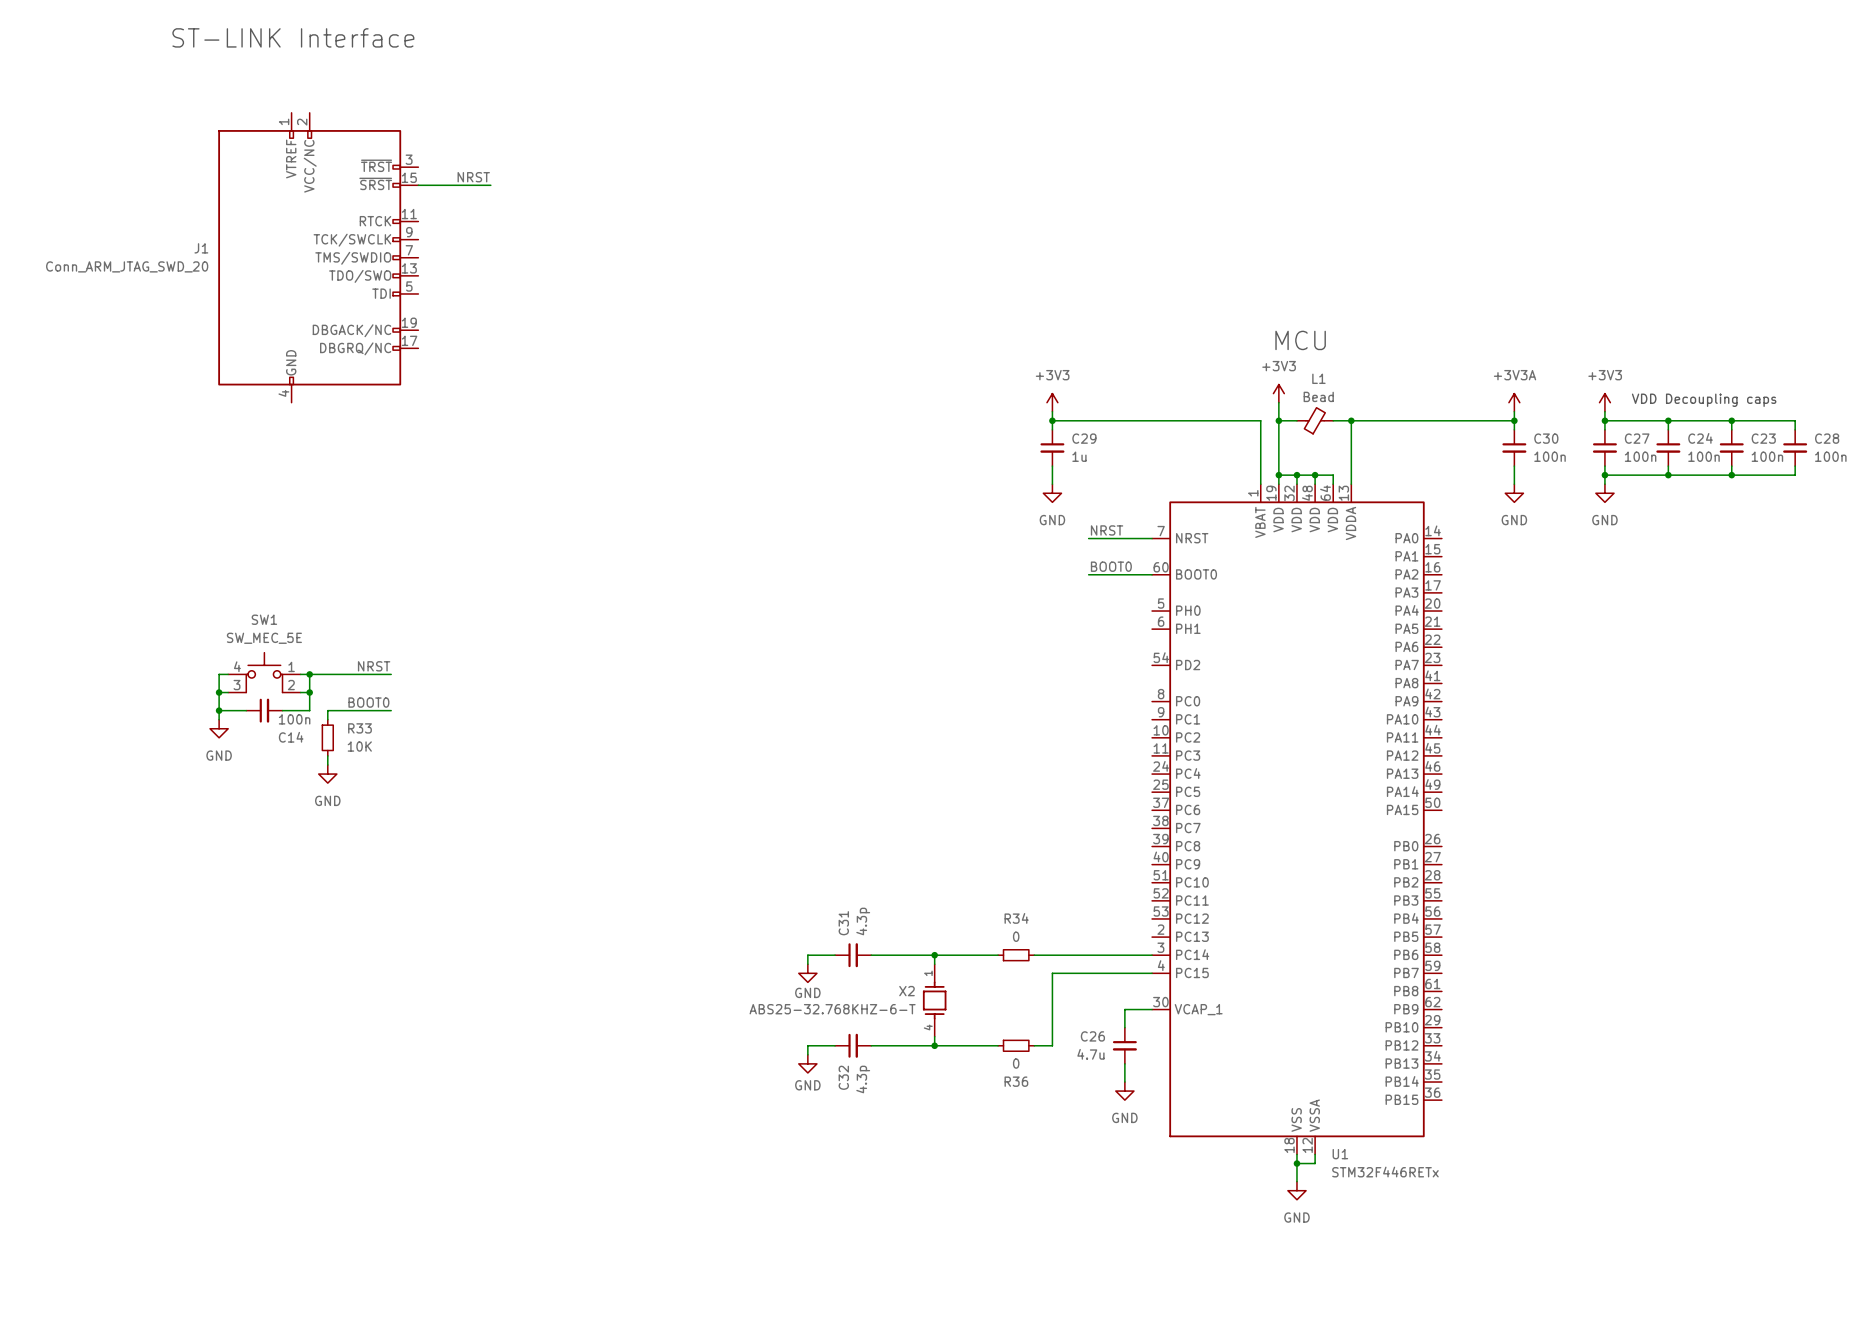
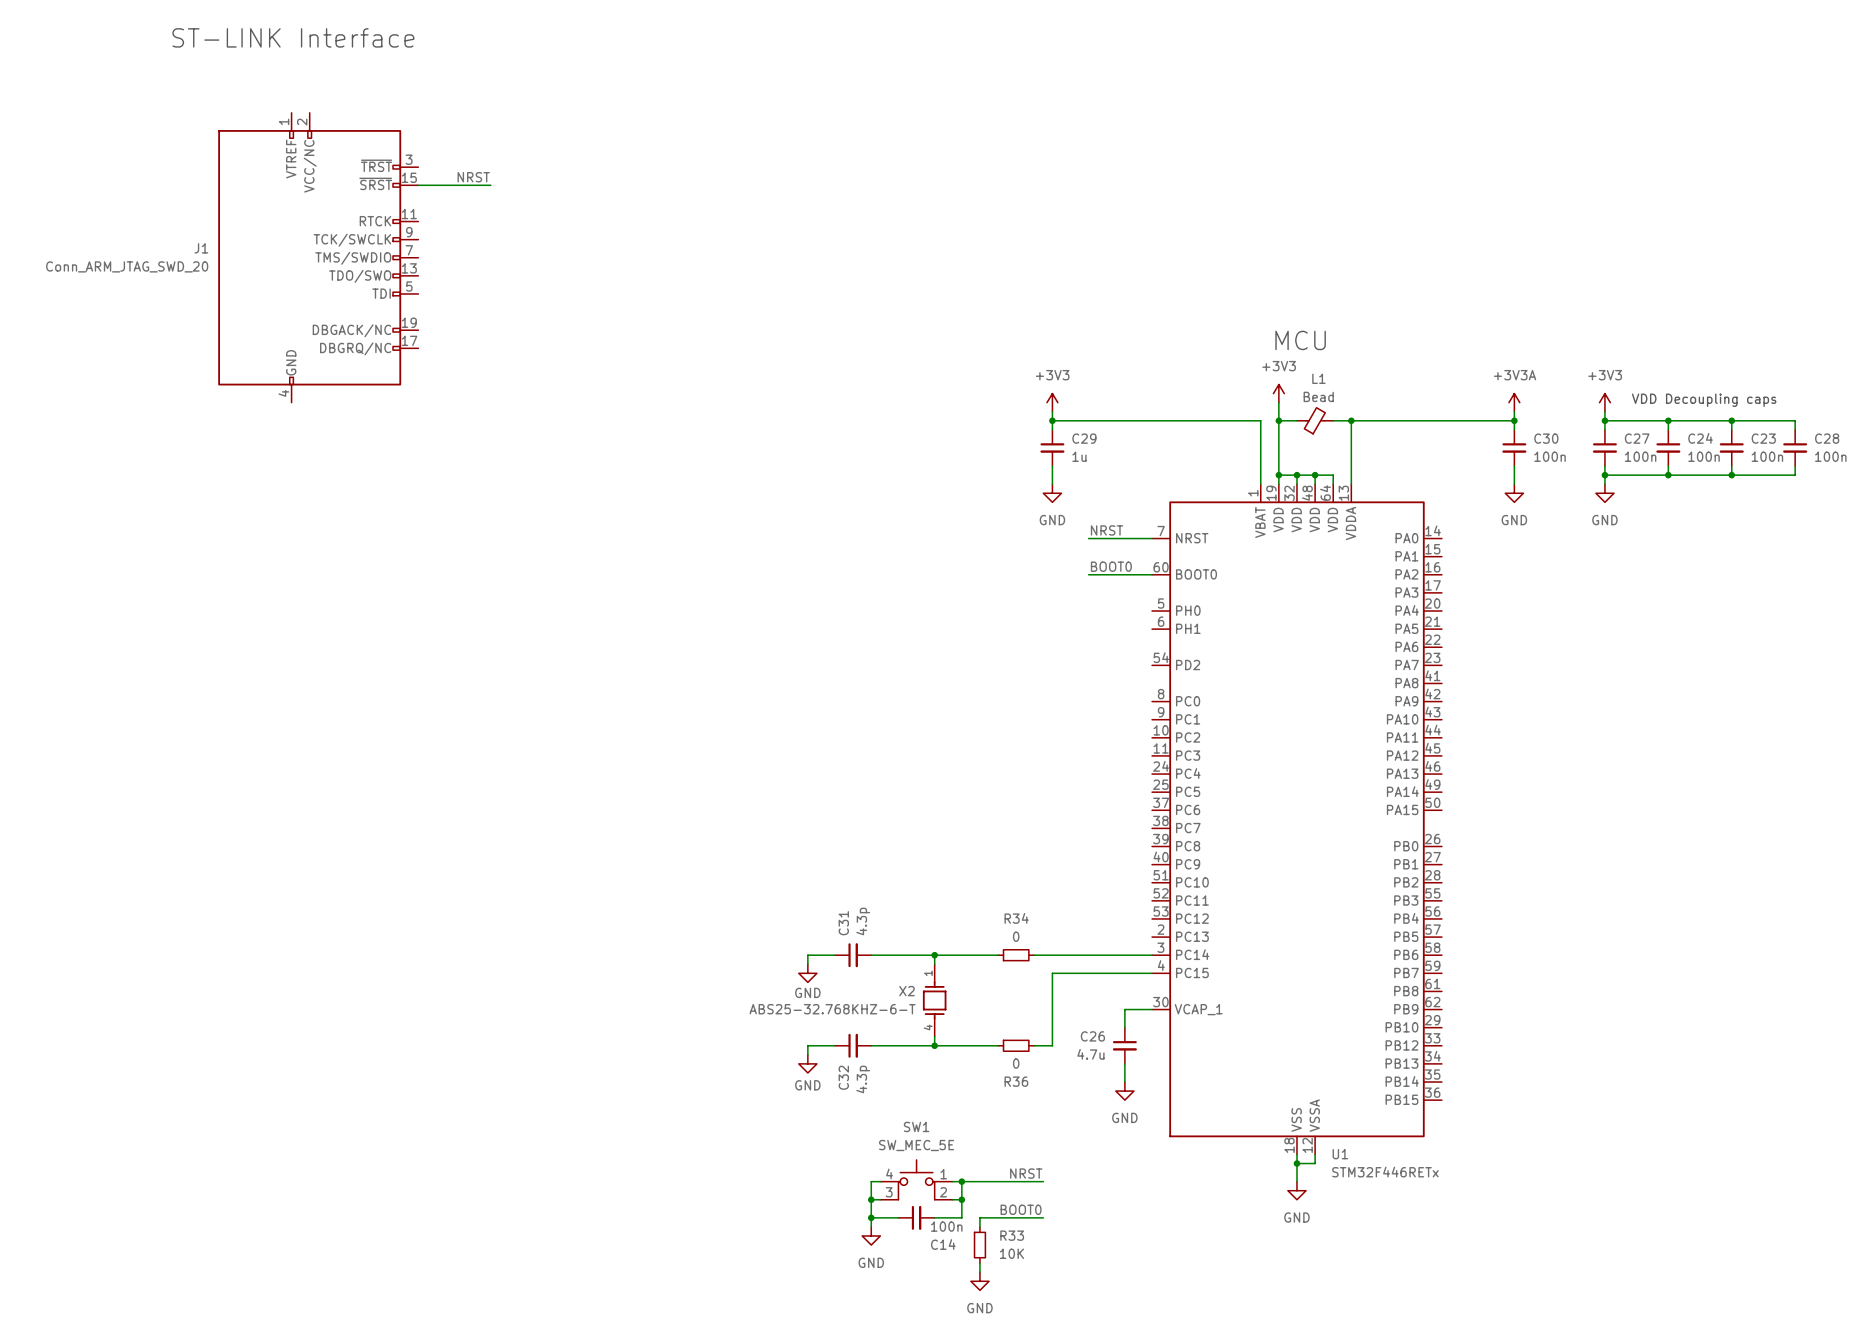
label: NRST (374, 666) -> none
SW1 position: (264, 672) -> (916, 1179)
wire: (228, 674) (219, 674) (219, 719) -> none
wire: (300, 674) (391, 674) -> none
wire: (309, 674) (309, 710) (282, 710) -> none
junction: (309, 674) -> none
wire: (219, 692) (228, 692) -> none
junction: (219, 692) -> none
wire: (300, 692) (309, 692) -> none
junction: (309, 692) -> none
label: BOOT0 (368, 702) -> none
wire: (219, 710) (246, 710) -> none
junction: (219, 710) -> none
C14 position: (264, 710) -> (916, 1217)
wire: (391, 710) (327, 710) (327, 719) -> none
power symbol: GND (219, 728) -> none
R33 position: (327, 737) -> (979, 1245)
wire: (327, 755) (327, 764) -> none
power symbol: GND (327, 774) -> none
label: none -> NRST (1026, 1173)
wire: none -> (880, 1181) (871, 1181) (871, 1226)
wire: none -> (952, 1181) (1043, 1181)
wire: none -> (961, 1181) (961, 1217) (934, 1217)
junction: none -> (961, 1181)
wire: none -> (871, 1199) (880, 1199)
junction: none -> (871, 1199)
wire: none -> (952, 1199) (961, 1199)
junction: none -> (961, 1199)
label: none -> BOOT0 (1021, 1209)
wire: none -> (871, 1217) (898, 1217)
junction: none -> (871, 1217)
wire: none -> (1043, 1217) (979, 1217) (979, 1226)
power symbol: none -> GND (871, 1235)
wire: none -> (979, 1263) (979, 1272)
power symbol: none -> GND (979, 1281)

